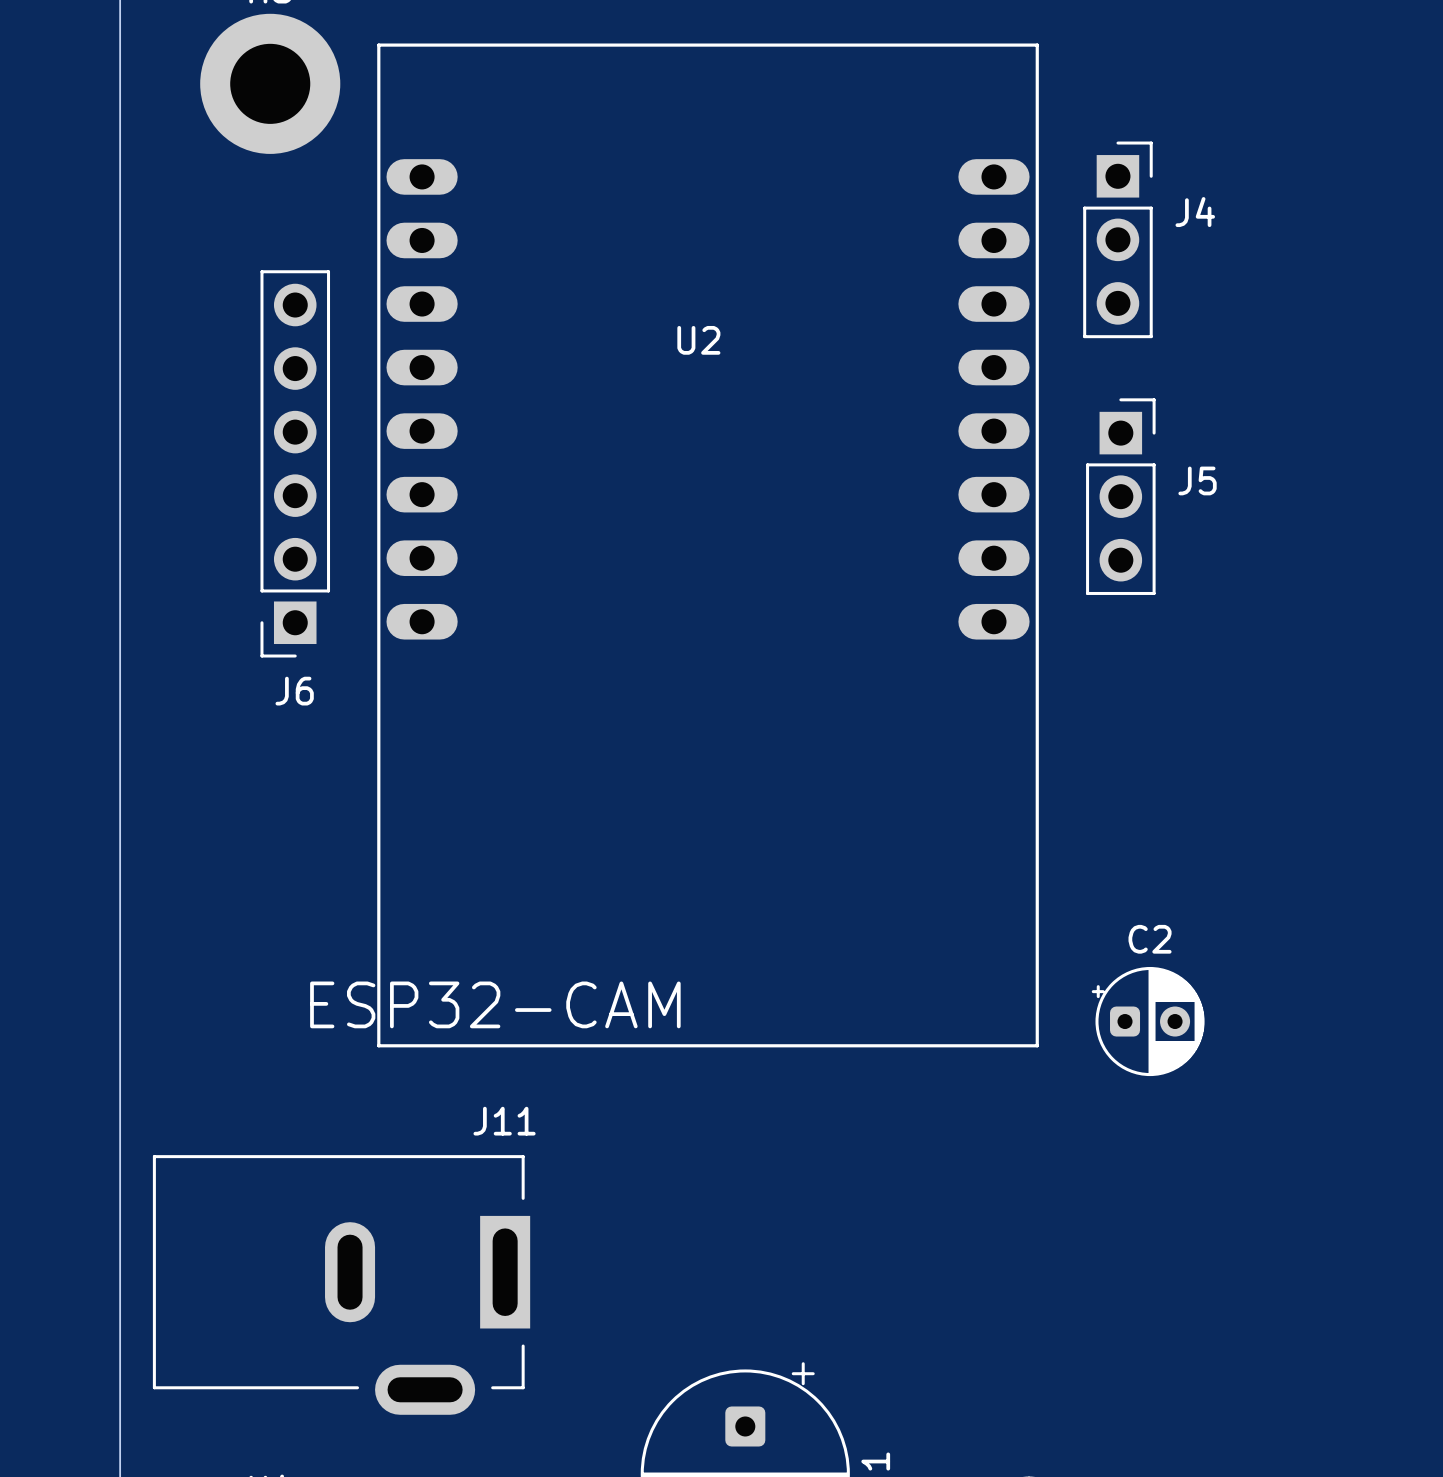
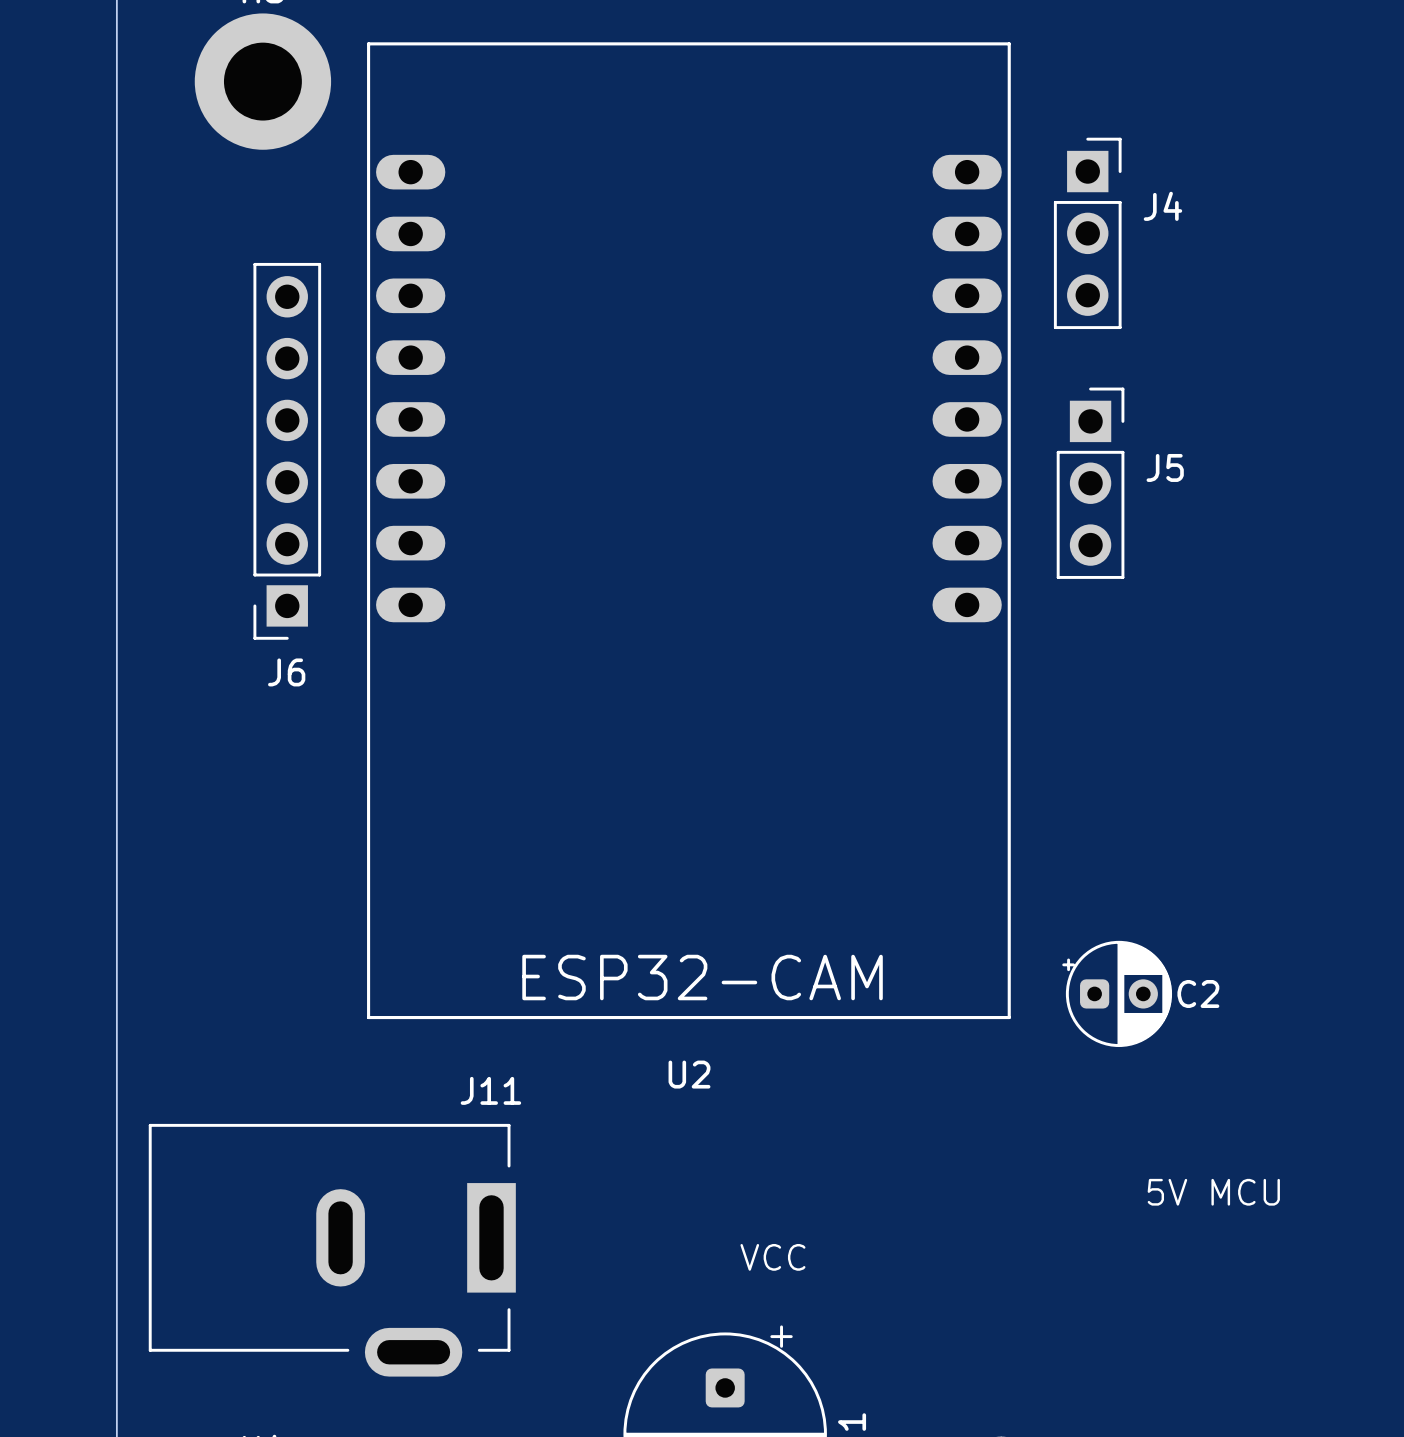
U2 name position: U2 (698, 340) -> U2 (689, 1074)
C2 name position: C2 (1150, 939) -> C2 (1198, 993)
U2 text position: ESP32-CAM (495, 1004) -> ESP32-CAM (702, 977)
text: none -> 5V MCU (1213, 1192)
text: none -> VCC (772, 1257)

